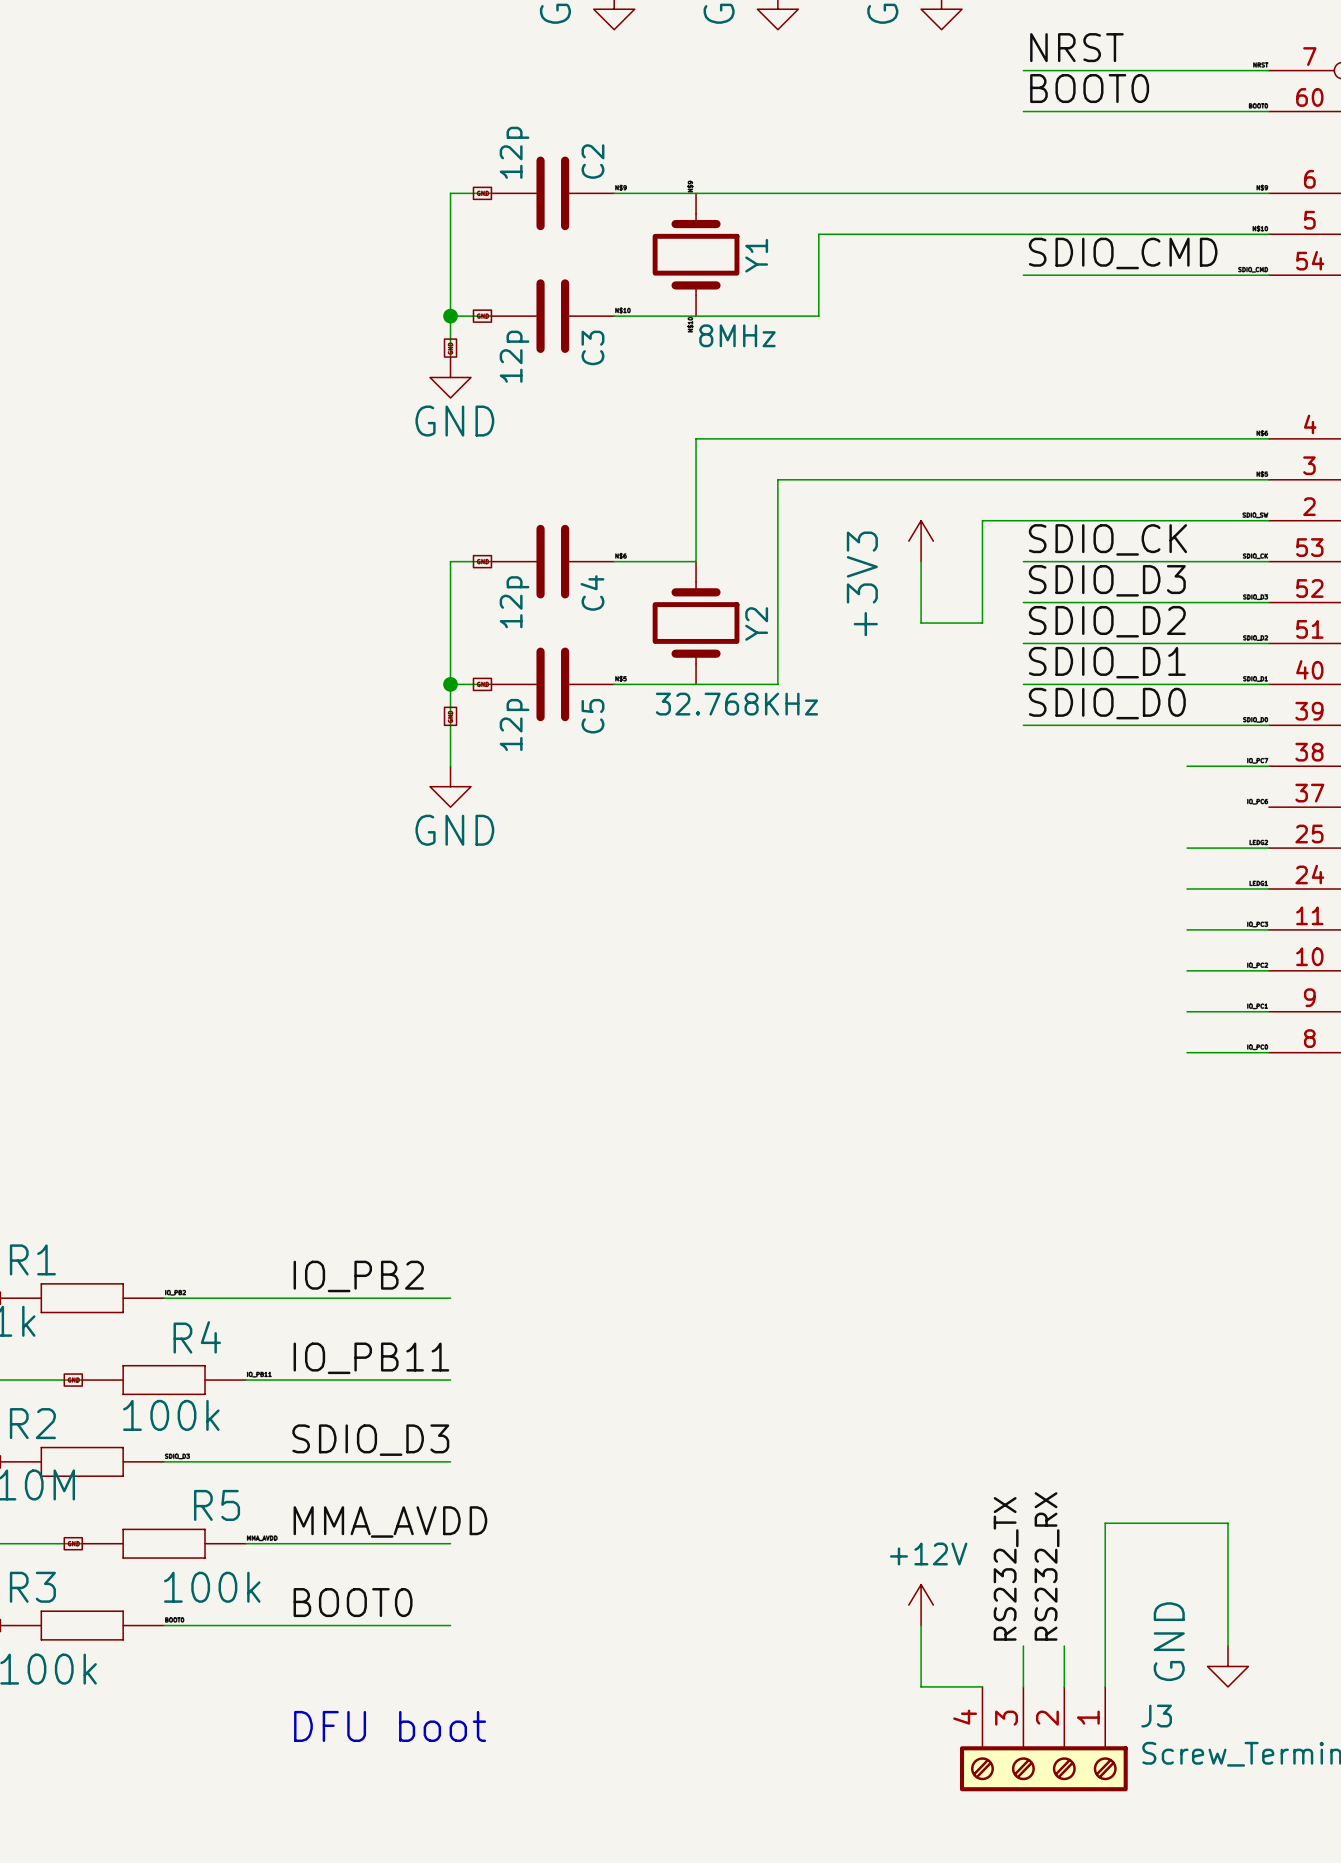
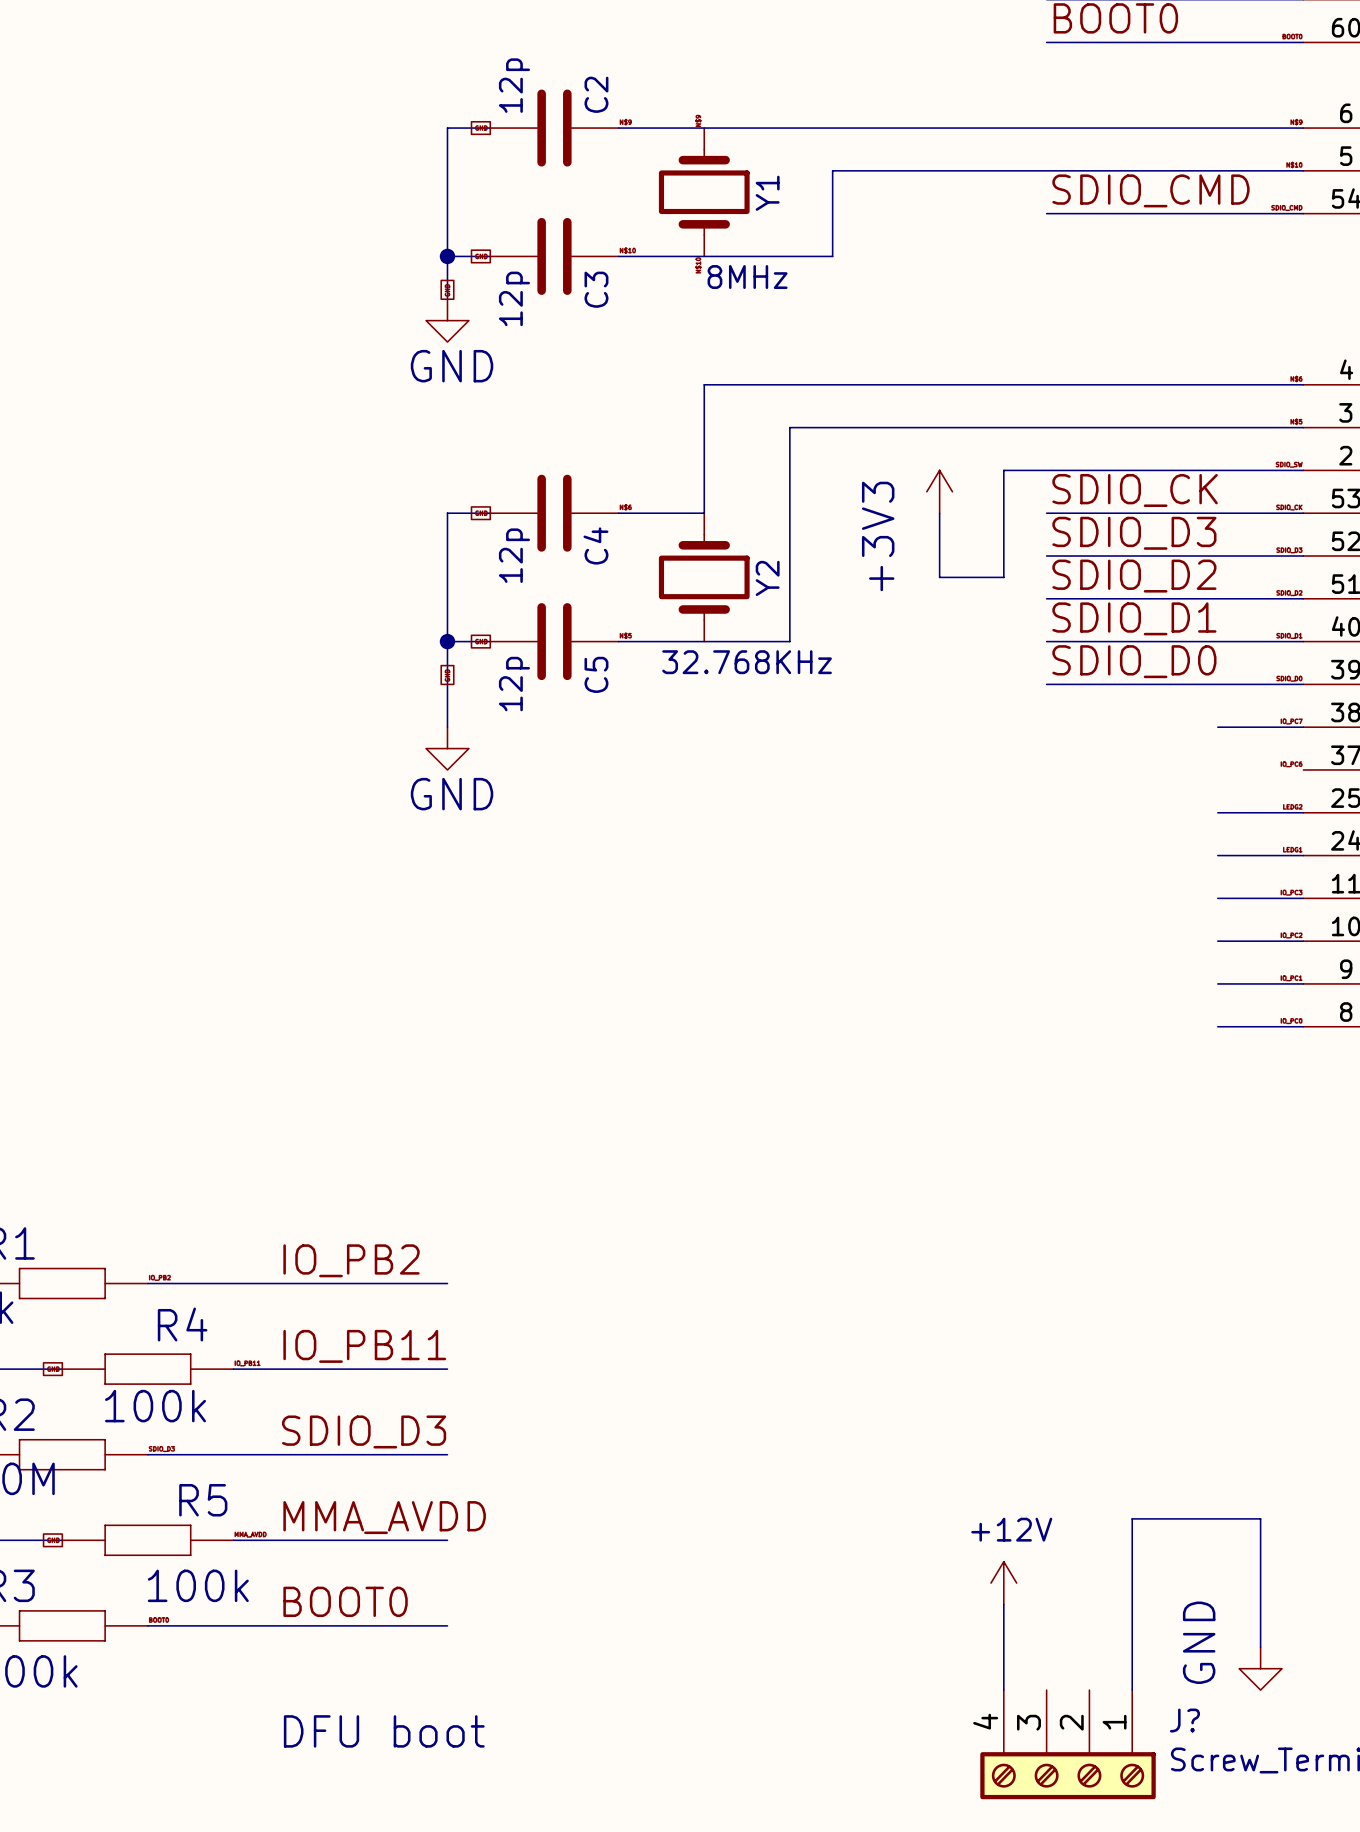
label: RS232_RX (1047, 1566) -> none
label: RS232_TX (1006, 1568) -> none
power symbol position: +12V (921, 1605) -> +12V (1003, 1583)
wire: (921, 1625) (921, 1686) (982, 1686) -> (1003, 1604) (1003, 1690)
wire: (1023, 1646) (1023, 1686) -> none
wire: (1064, 1646) (1064, 1686) -> none
J3 name: J3 (1156, 1716) -> J? (1184, 1720)

